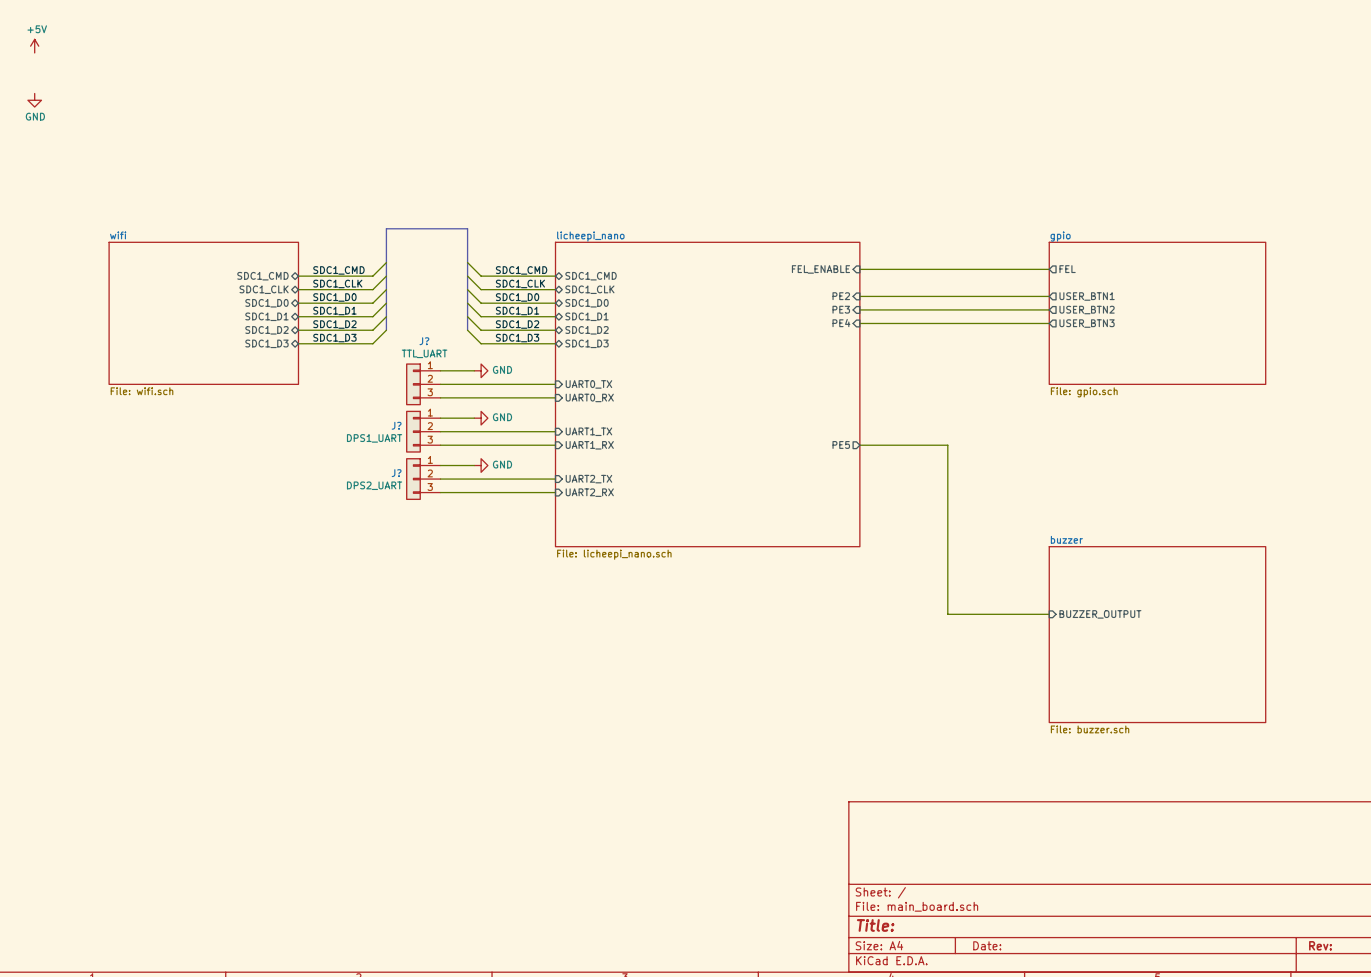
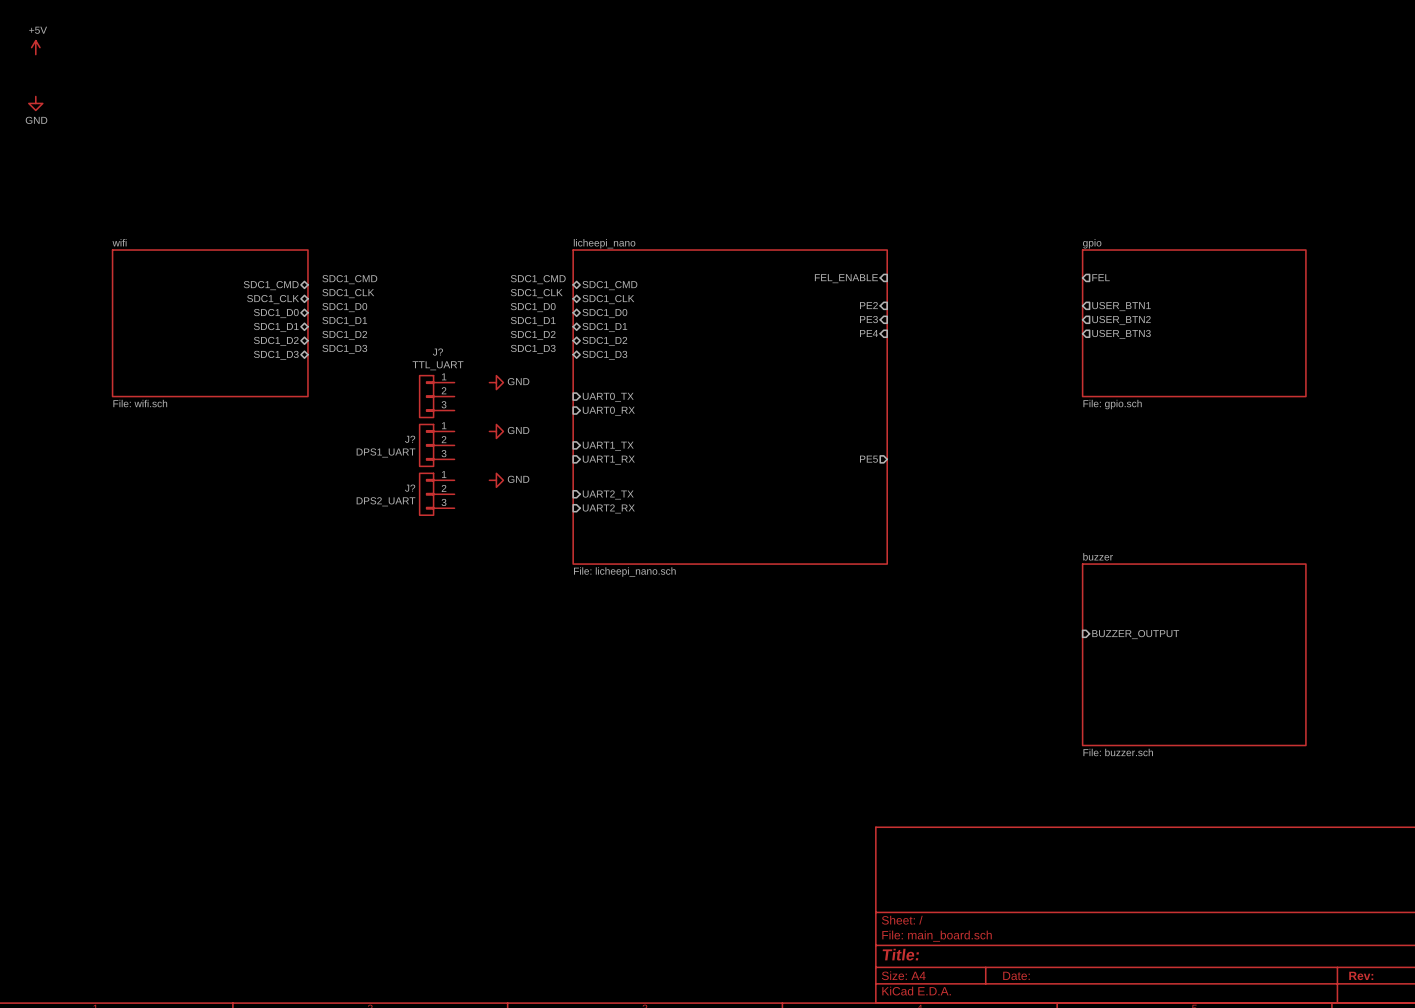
wire: (386, 262) (372, 276) (298, 276) -> none
wire: (467, 262) (481, 276) (555, 276) -> none
wire: (859, 269) (1049, 269) -> none
wire: (386, 276) (372, 289) (298, 289) -> none
wire: (467, 276) (481, 289) (555, 289) -> none
wire: (386, 289) (372, 303) (298, 303) -> none
wire: (467, 289) (481, 303) (555, 303) -> none
wire: (859, 296) (1049, 296) -> none
wire: (386, 303) (372, 316) (298, 316) -> none
wire: (467, 303) (481, 316) (555, 316) -> none
wire: (859, 309) (1049, 309) -> none
wire: (386, 316) (372, 330) (298, 330) -> none
wire: (467, 316) (481, 330) (555, 330) -> none
wire: (859, 323) (1049, 323) -> none
wire: (386, 330) (372, 343) (298, 343) -> none
bus: (386, 330) (386, 228) (467, 228) (467, 330) -> none
wire: (467, 330) (481, 343) (555, 343) -> none
wire: (440, 370) (474, 370) -> none
wire: (440, 384) (555, 384) -> none
wire: (440, 397) (555, 397) -> none
wire: (440, 418) (474, 418) -> none
wire: (440, 431) (555, 431) -> none
wire: (440, 445) (555, 445) -> none
wire: (859, 445) (947, 445) (947, 614) (1049, 614) -> none
wire: (440, 465) (474, 465) -> none
wire: (440, 479) (555, 479) -> none
wire: (440, 492) (555, 492) -> none

